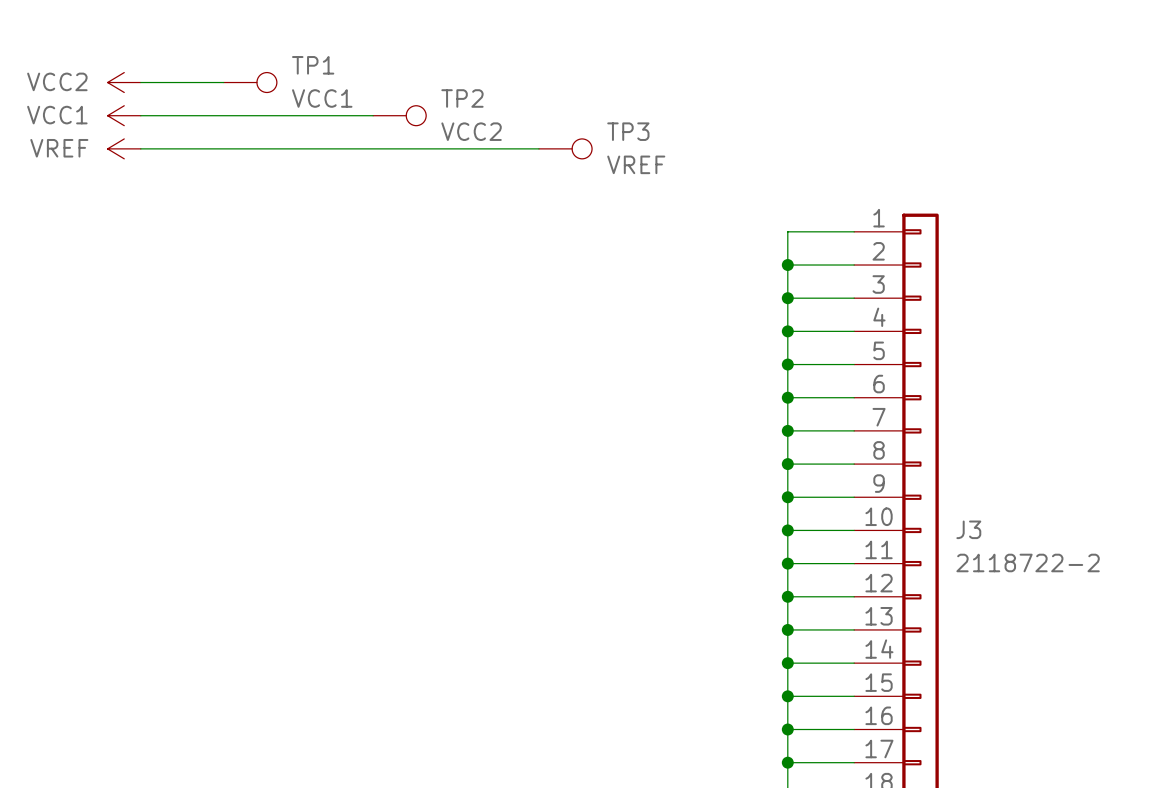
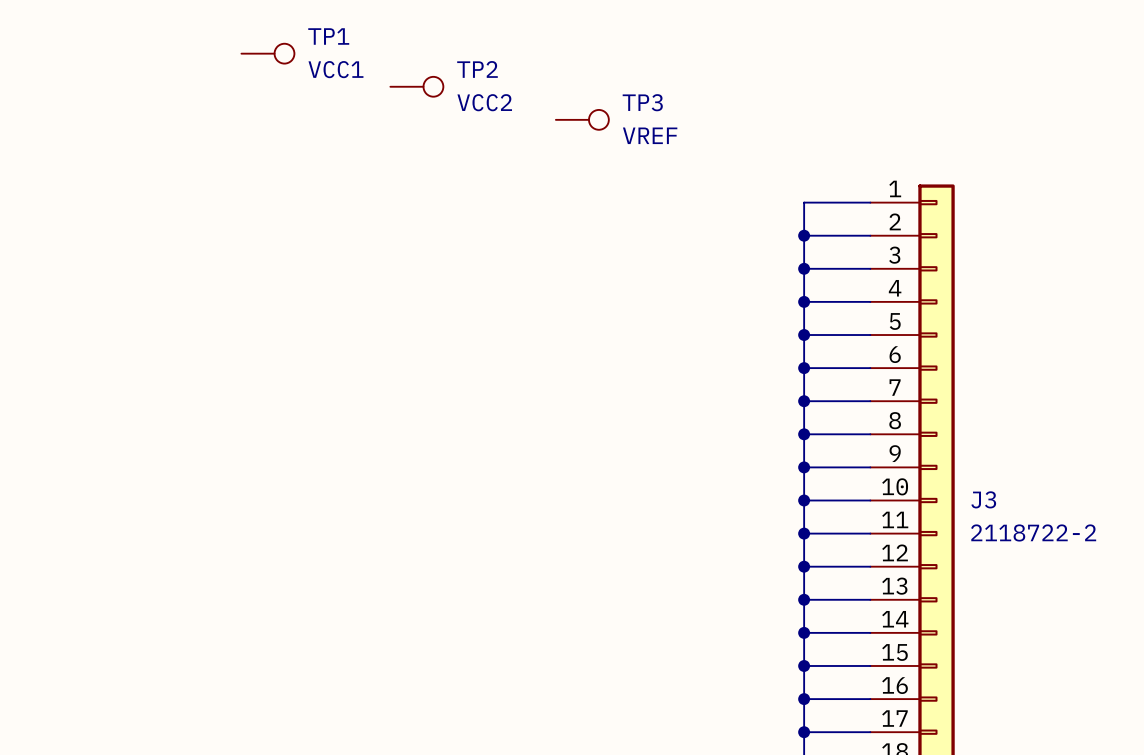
power symbol: VCC2 (124, 82) -> none
wire: (140, 82) (223, 82) -> none
power symbol: VCC1 (124, 115) -> none
wire: (140, 115) (373, 115) -> none
power symbol: VREF (124, 148) -> none
wire: (140, 148) (538, 148) -> none

